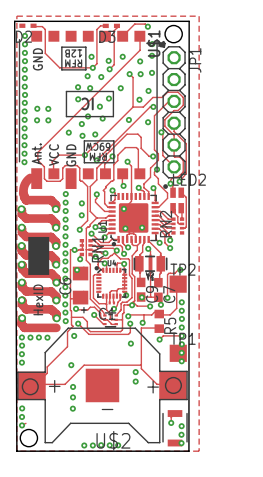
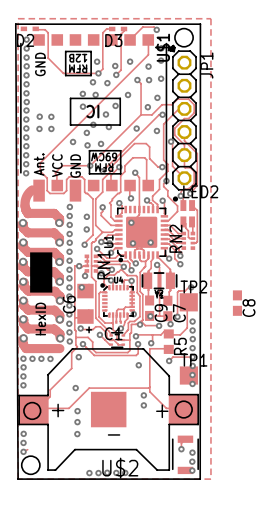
C8: none -> (237, 303)

